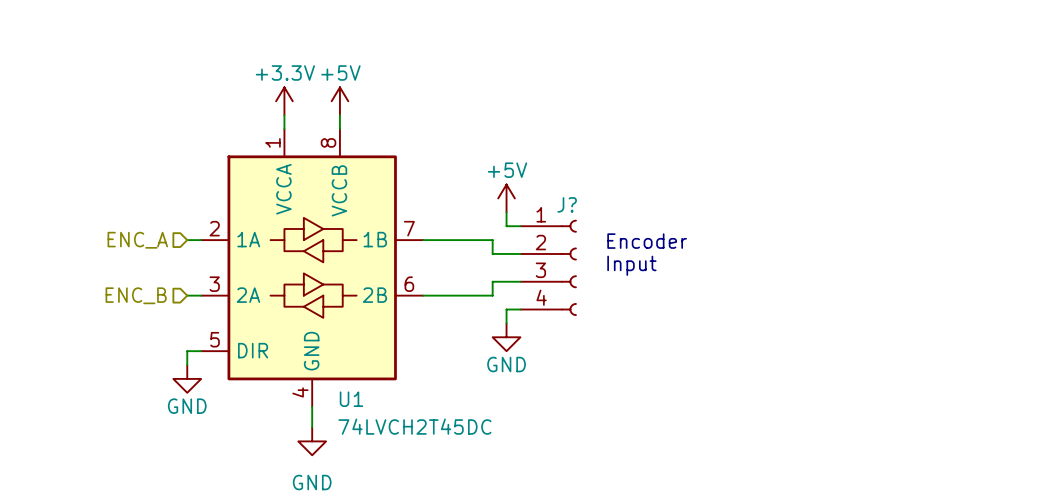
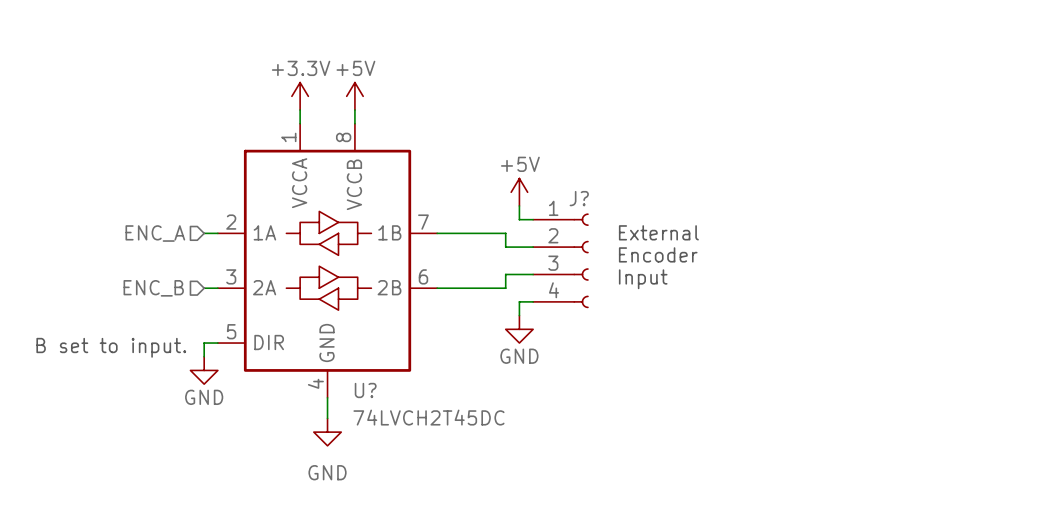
text: Encoder (647, 241) -> External (658, 232)
text: Input (631, 265) -> Encoder (658, 254)
text: none -> Input (643, 279)
text: none -> B set to input. (111, 347)
U1 name: U1 (351, 399) -> U? (365, 390)

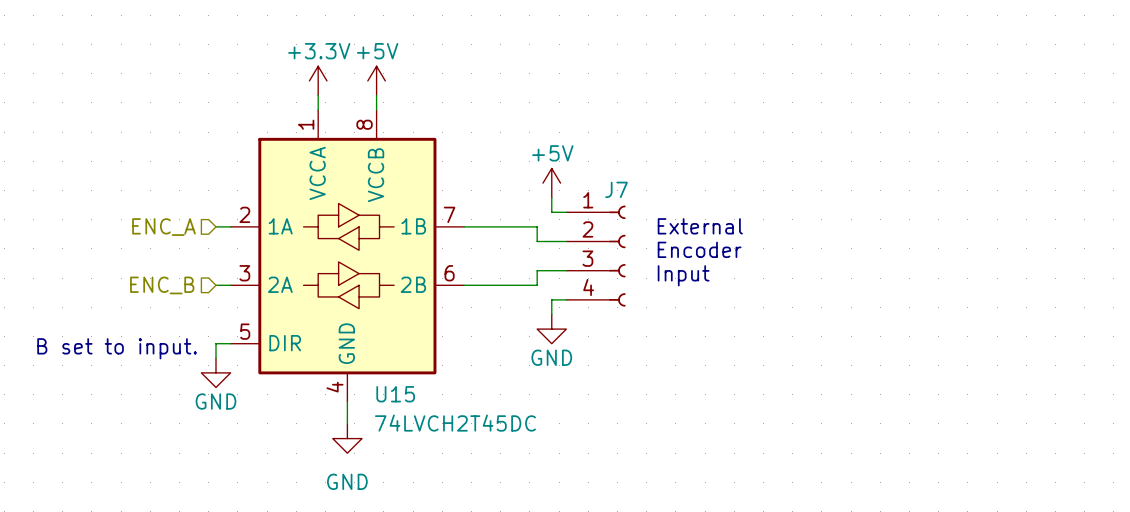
J? name: J? (579, 198) -> J7 (616, 189)
U? name: U? (365, 390) -> U15 (395, 394)

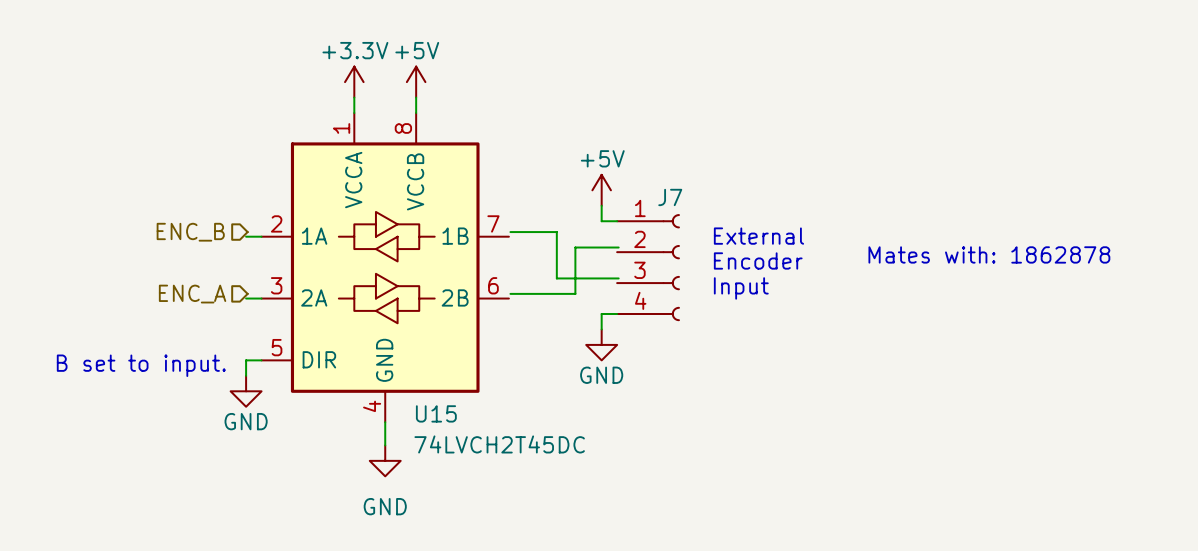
wire: none -> (510, 232) (556, 232) (556, 278) (618, 278)
wire: (464, 226) (537, 226) (537, 241) (566, 241) -> none
hierarchical label: ENC_A (163, 227) -> ENC_B (190, 232)
wire: none -> (618, 247) (575, 247) (575, 293) (510, 293)
text: none -> Mates with: 1862878 (989, 254)
wire: (566, 270) (537, 270) (537, 285) (464, 285) -> none
hierarchical label: ENC_B (162, 285) -> ENC_A (192, 294)

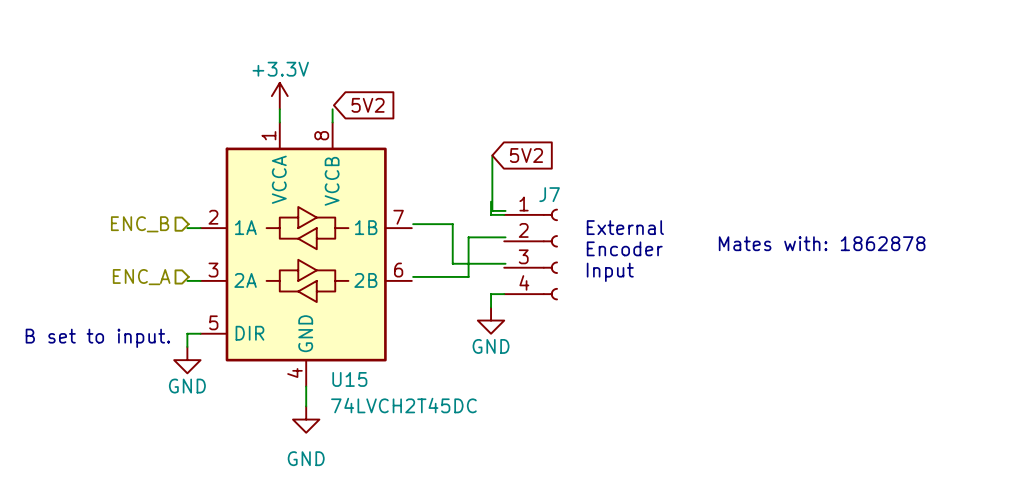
power symbol: +5V (416, 82) -> none
global label: none -> 5V2 (368, 105)
wire: none -> (492, 155) (492, 210) (505, 210)
global label: none -> 5V2 (526, 155)
power symbol: +5V (601, 190) -> none

